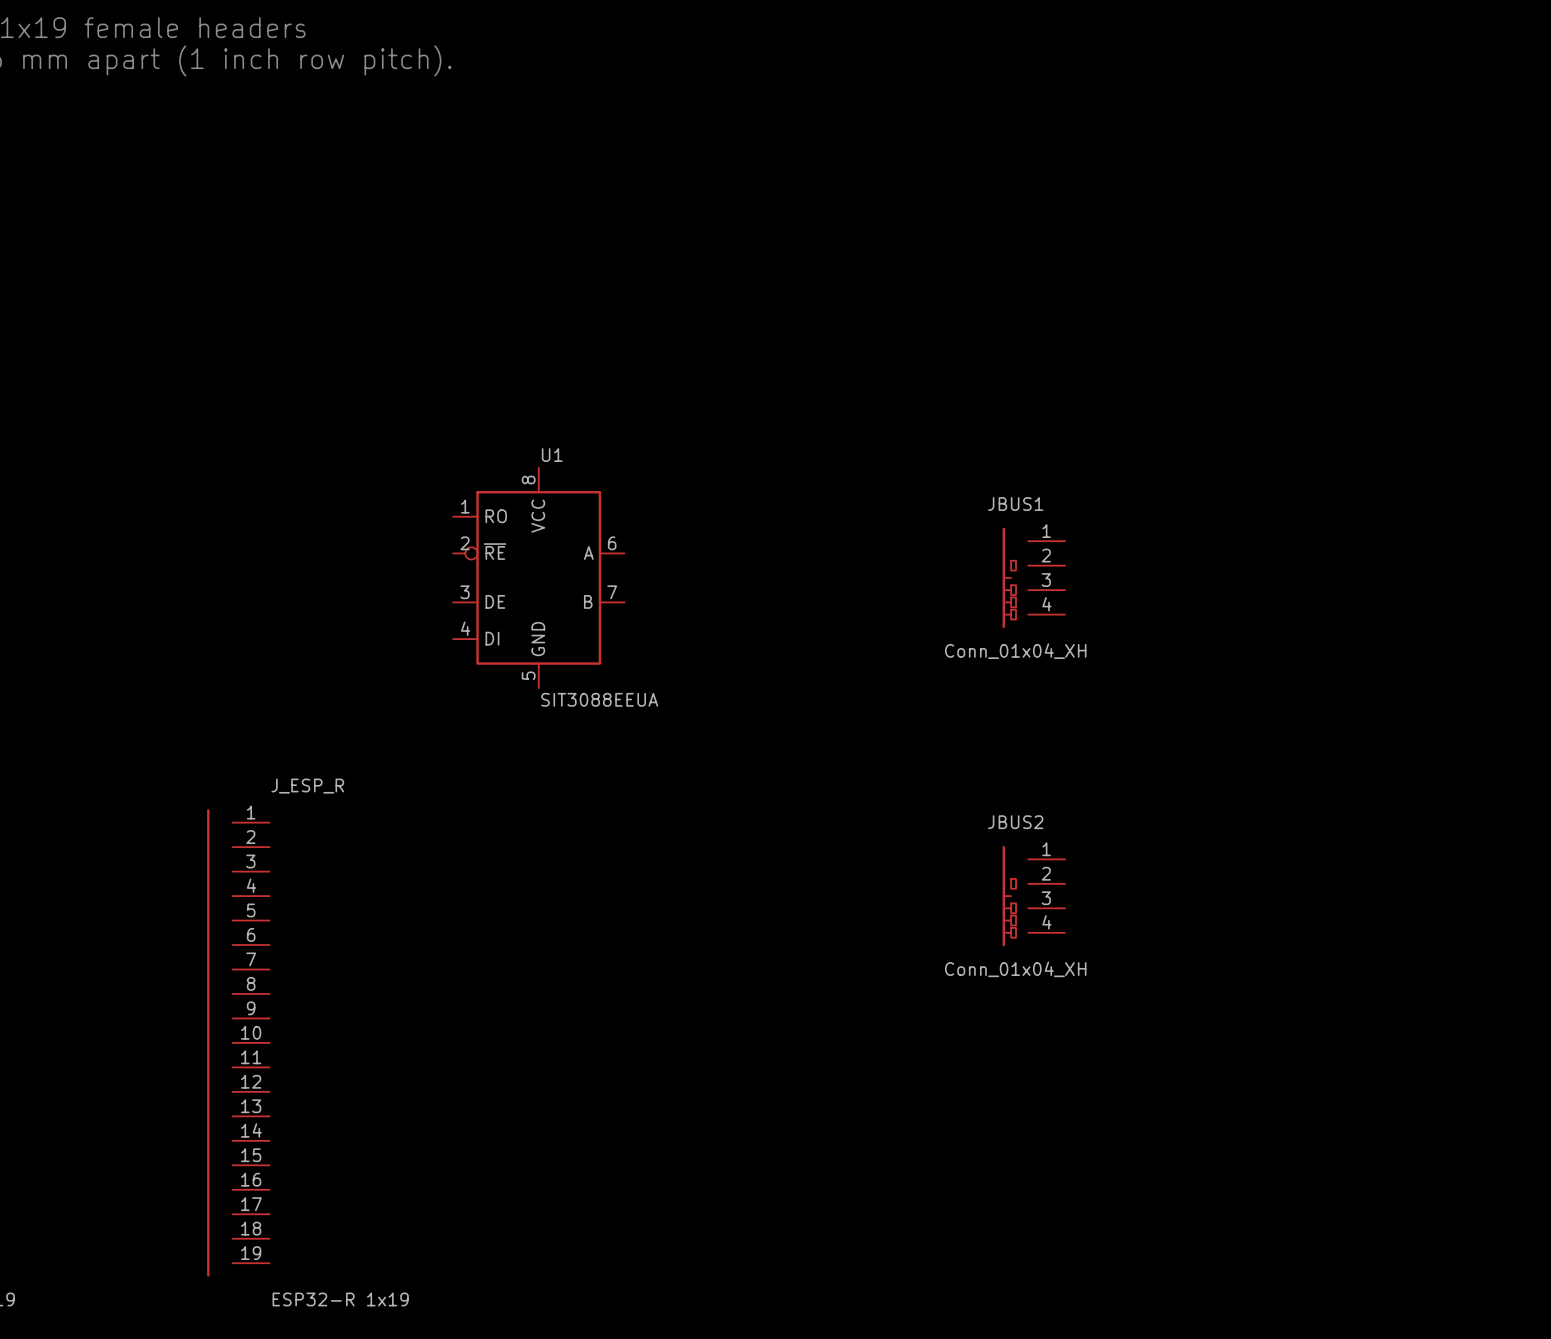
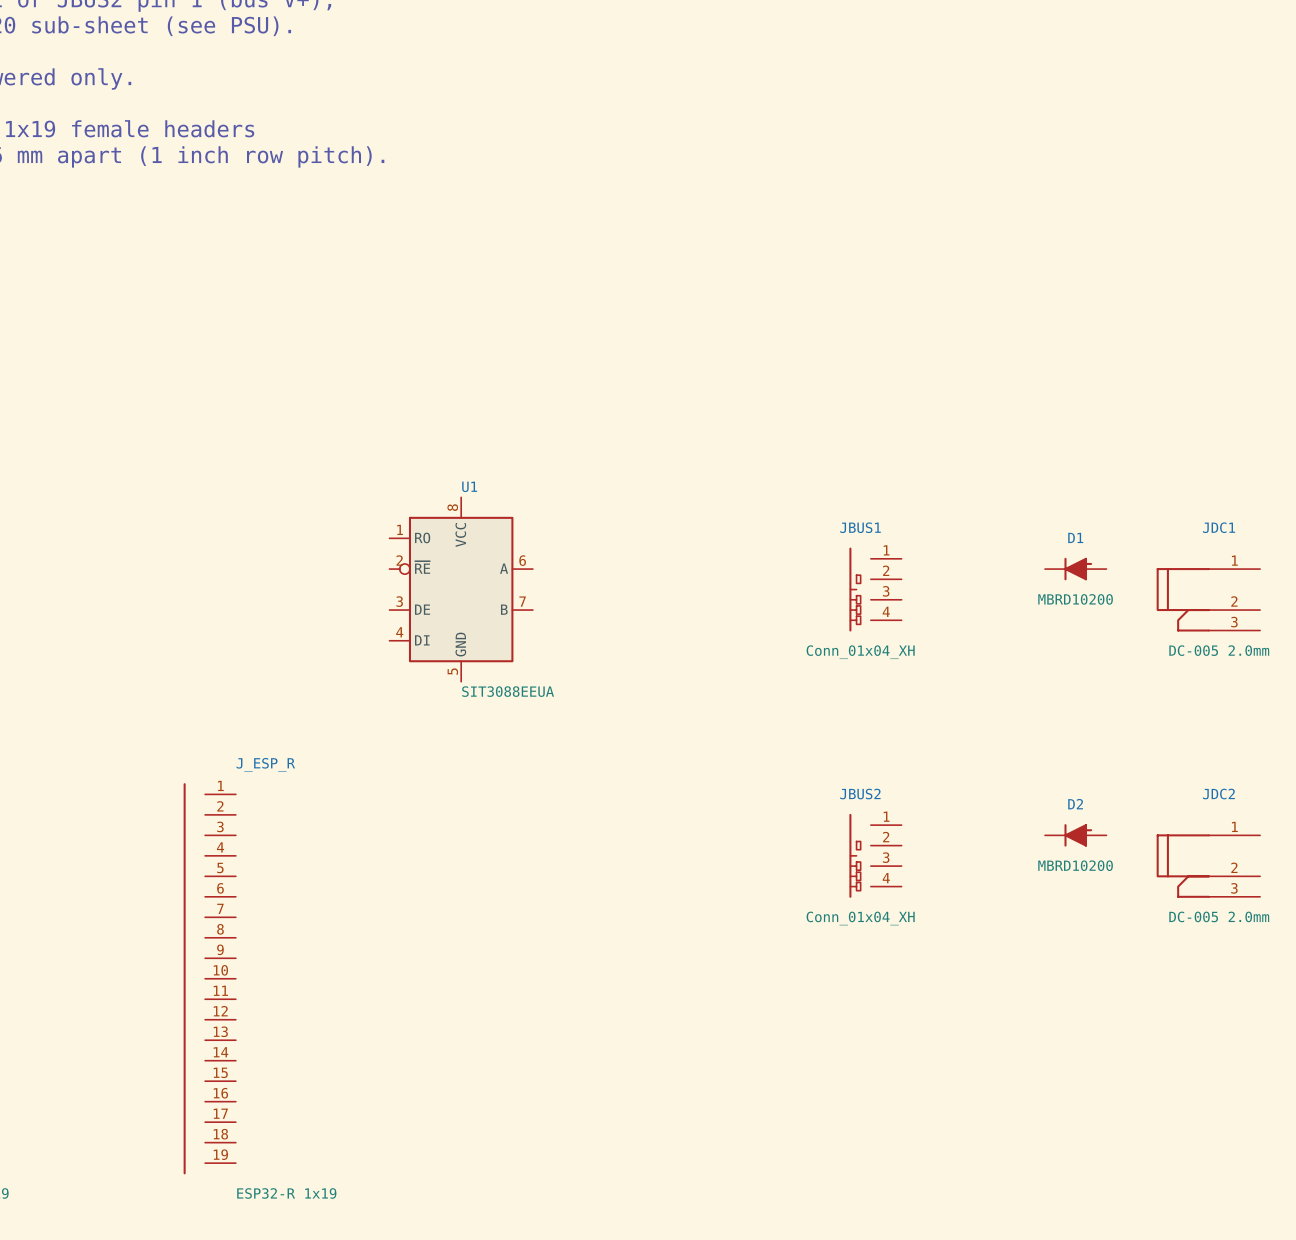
D1: none -> MBRD10200 (1075, 569)
JDC1: none -> DC-005 2.0mm (1208, 599)
D2: none -> MBRD10200 (1075, 835)
JDC2: none -> DC-005 2.0mm (1208, 866)

